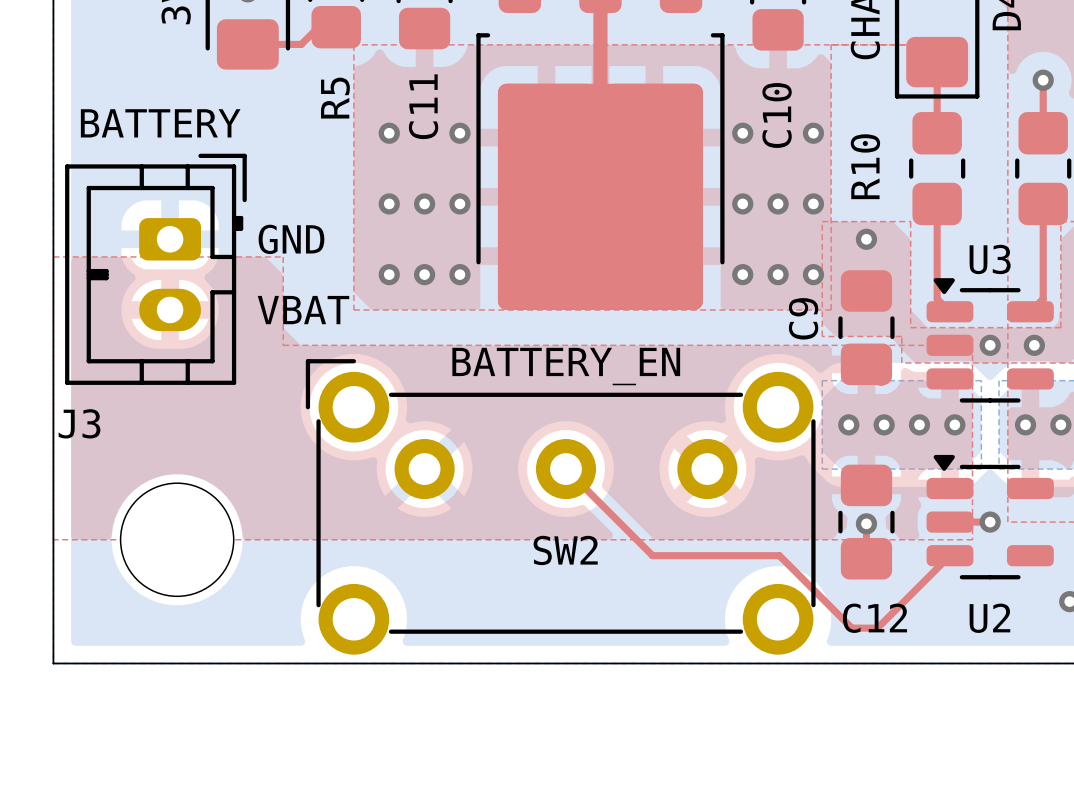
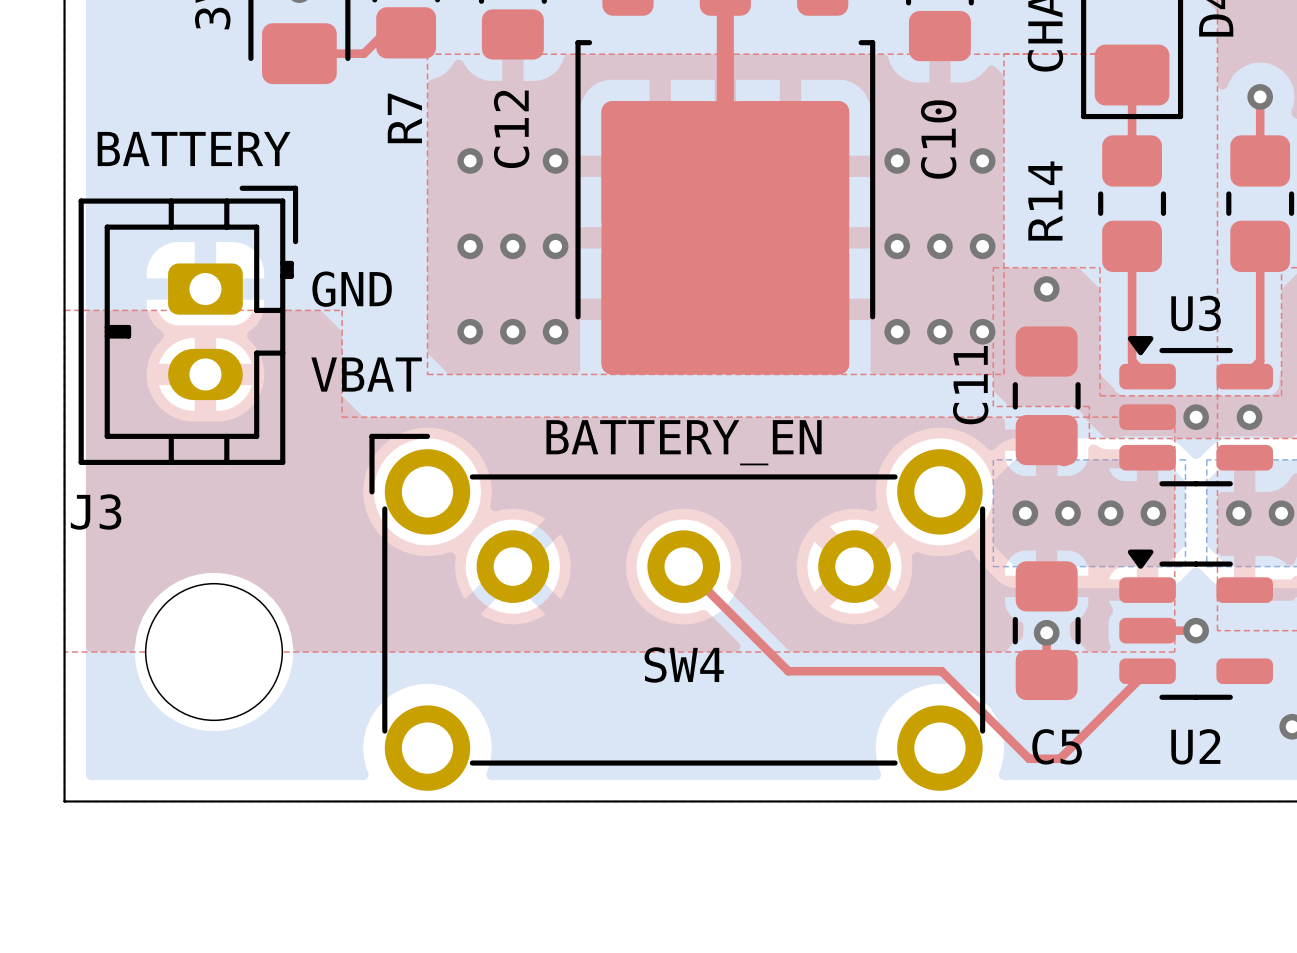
R5 name: R5 (335, 98) -> R7 (404, 118)
C11 name: C11 (423, 106) -> C12 (511, 129)
R10 name: R10 (865, 166) -> R14 (1045, 201)
C9 name: C9 (803, 318) -> C11 (970, 385)
SW2 name: SW2 (565, 550) -> SW4 (684, 664)
C12 name: C12 (874, 618) -> C5 (1057, 746)

